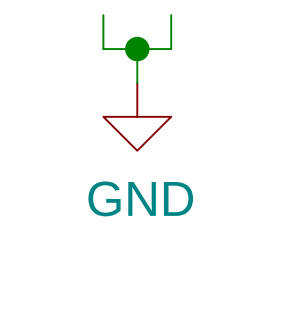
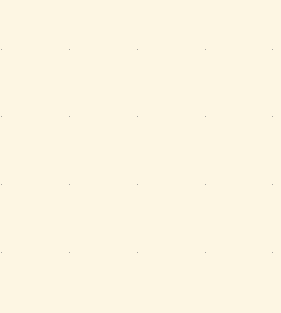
wire: (103, 15) (103, 49) (171, 49) (171, 15) -> none
wire: (137, 49) (137, 82) -> none
junction: (137, 49) -> none
power symbol: GND (137, 116) -> none

